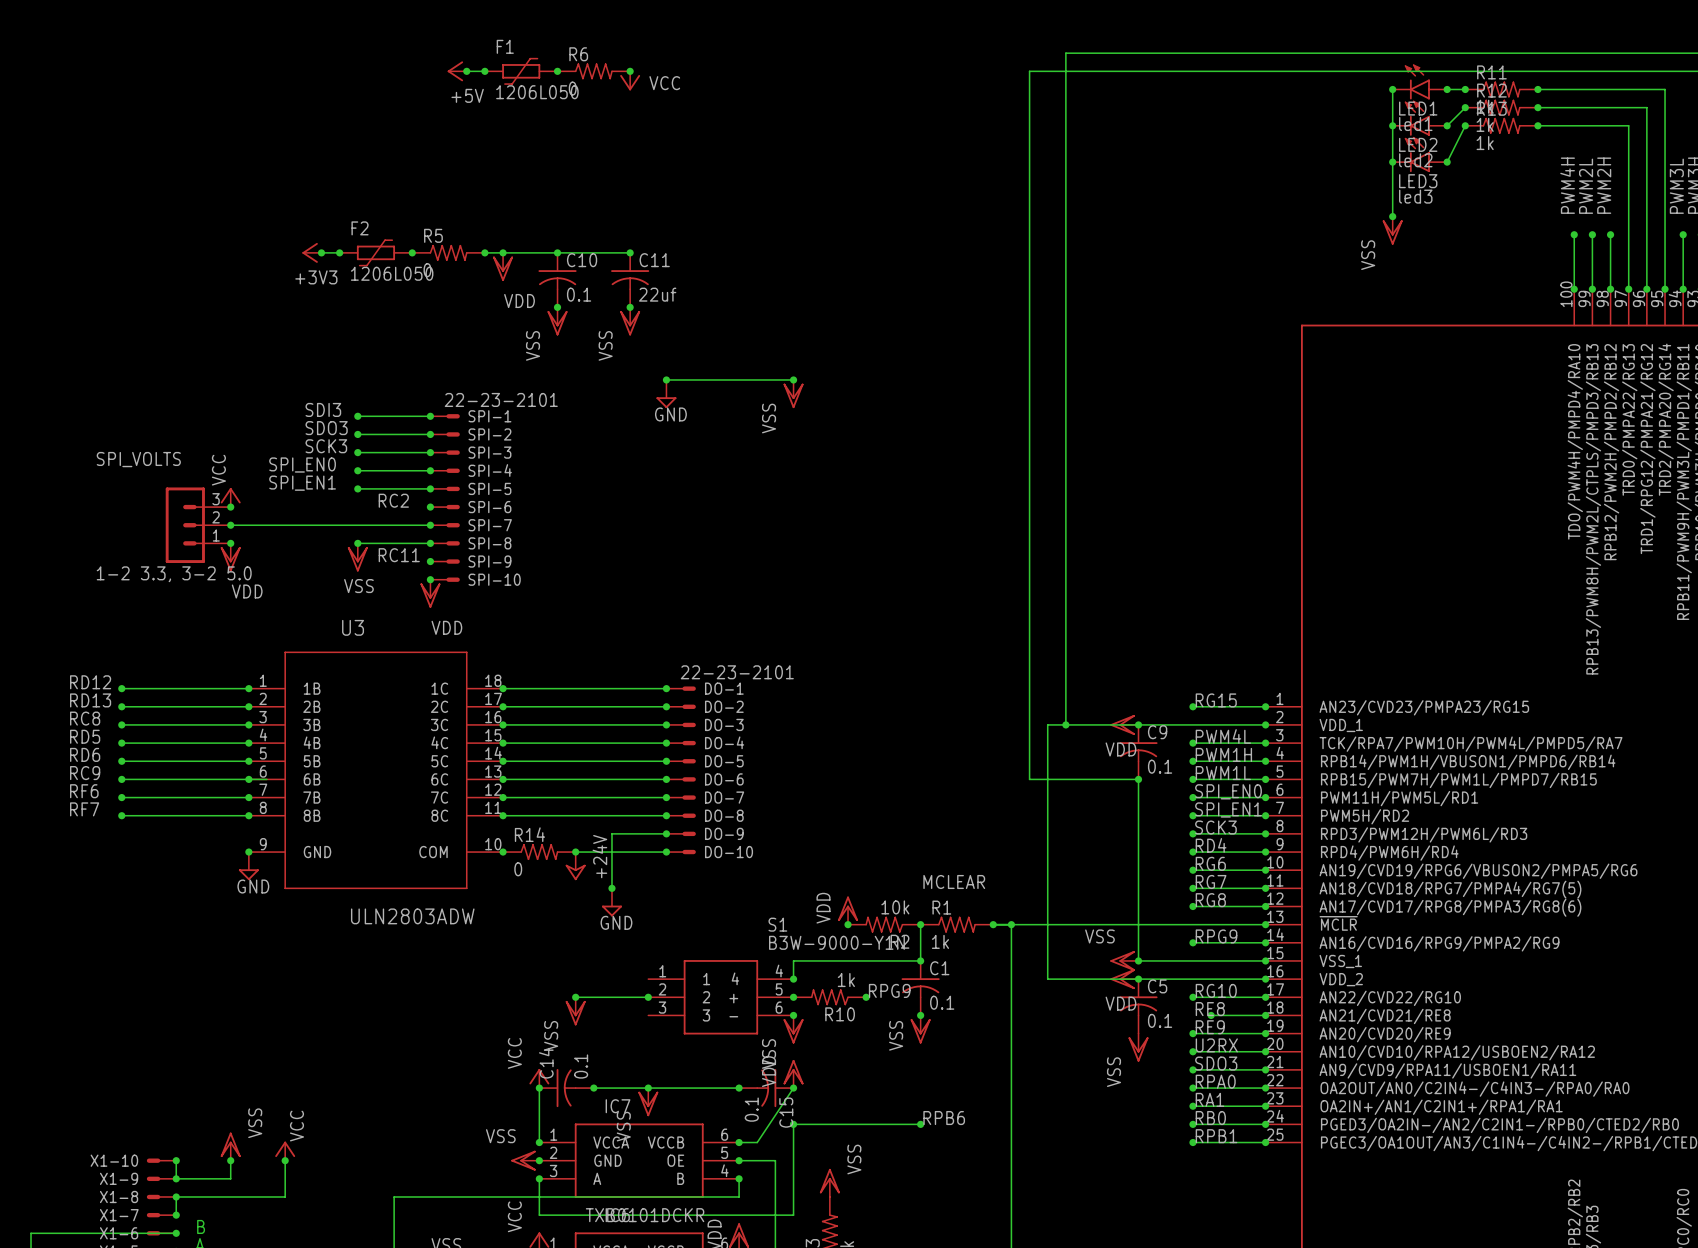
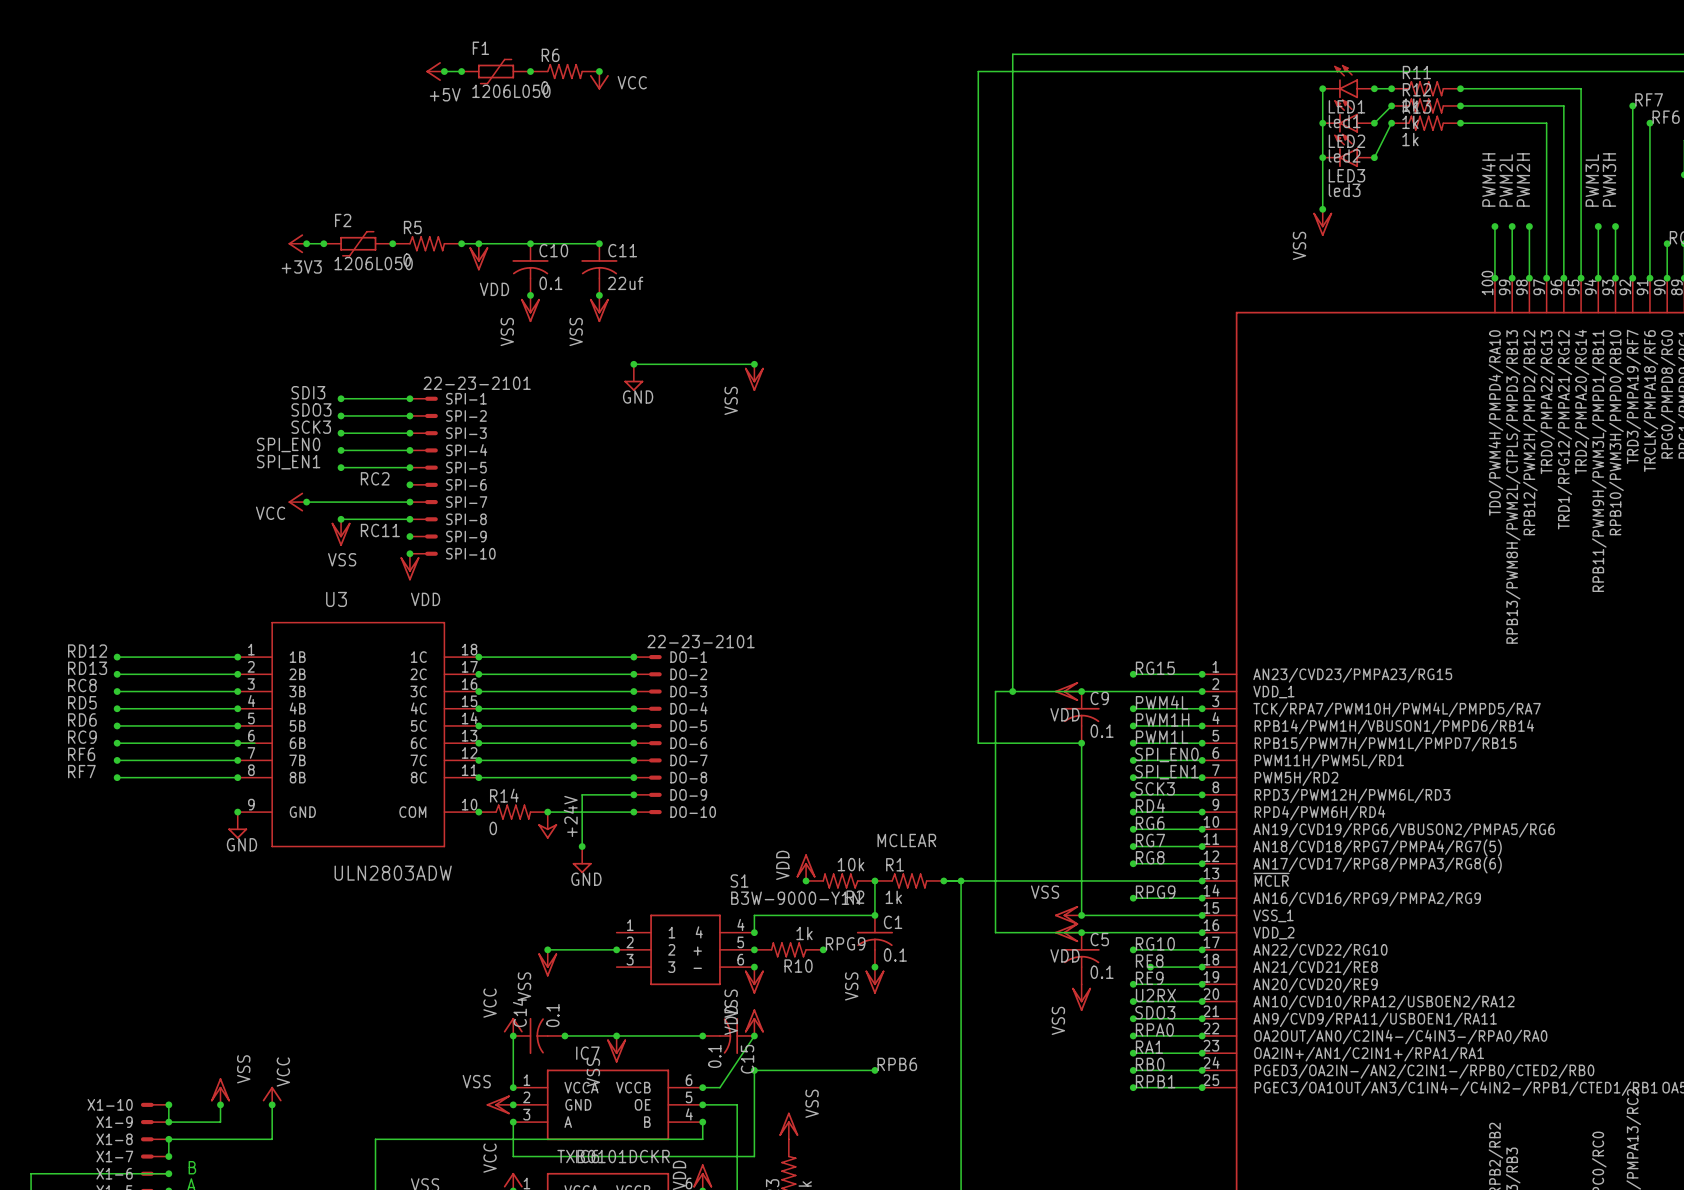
power symbol rotation: 0° (230, 495) -> 90° counterclockwise (295, 502)
power symbol position: VCC (230, 497) -> VCC (297, 502)
junction: (230, 507) -> none
SPI_VOLTS: 1-2 3.3, 3-2 5.0 (198, 525) -> none
wire: (230, 525) (321, 525) -> none
junction: (230, 525) -> none
junction: none -> (306, 502)
junction: (230, 543) -> none
power symbol: VDD (230, 557) -> none

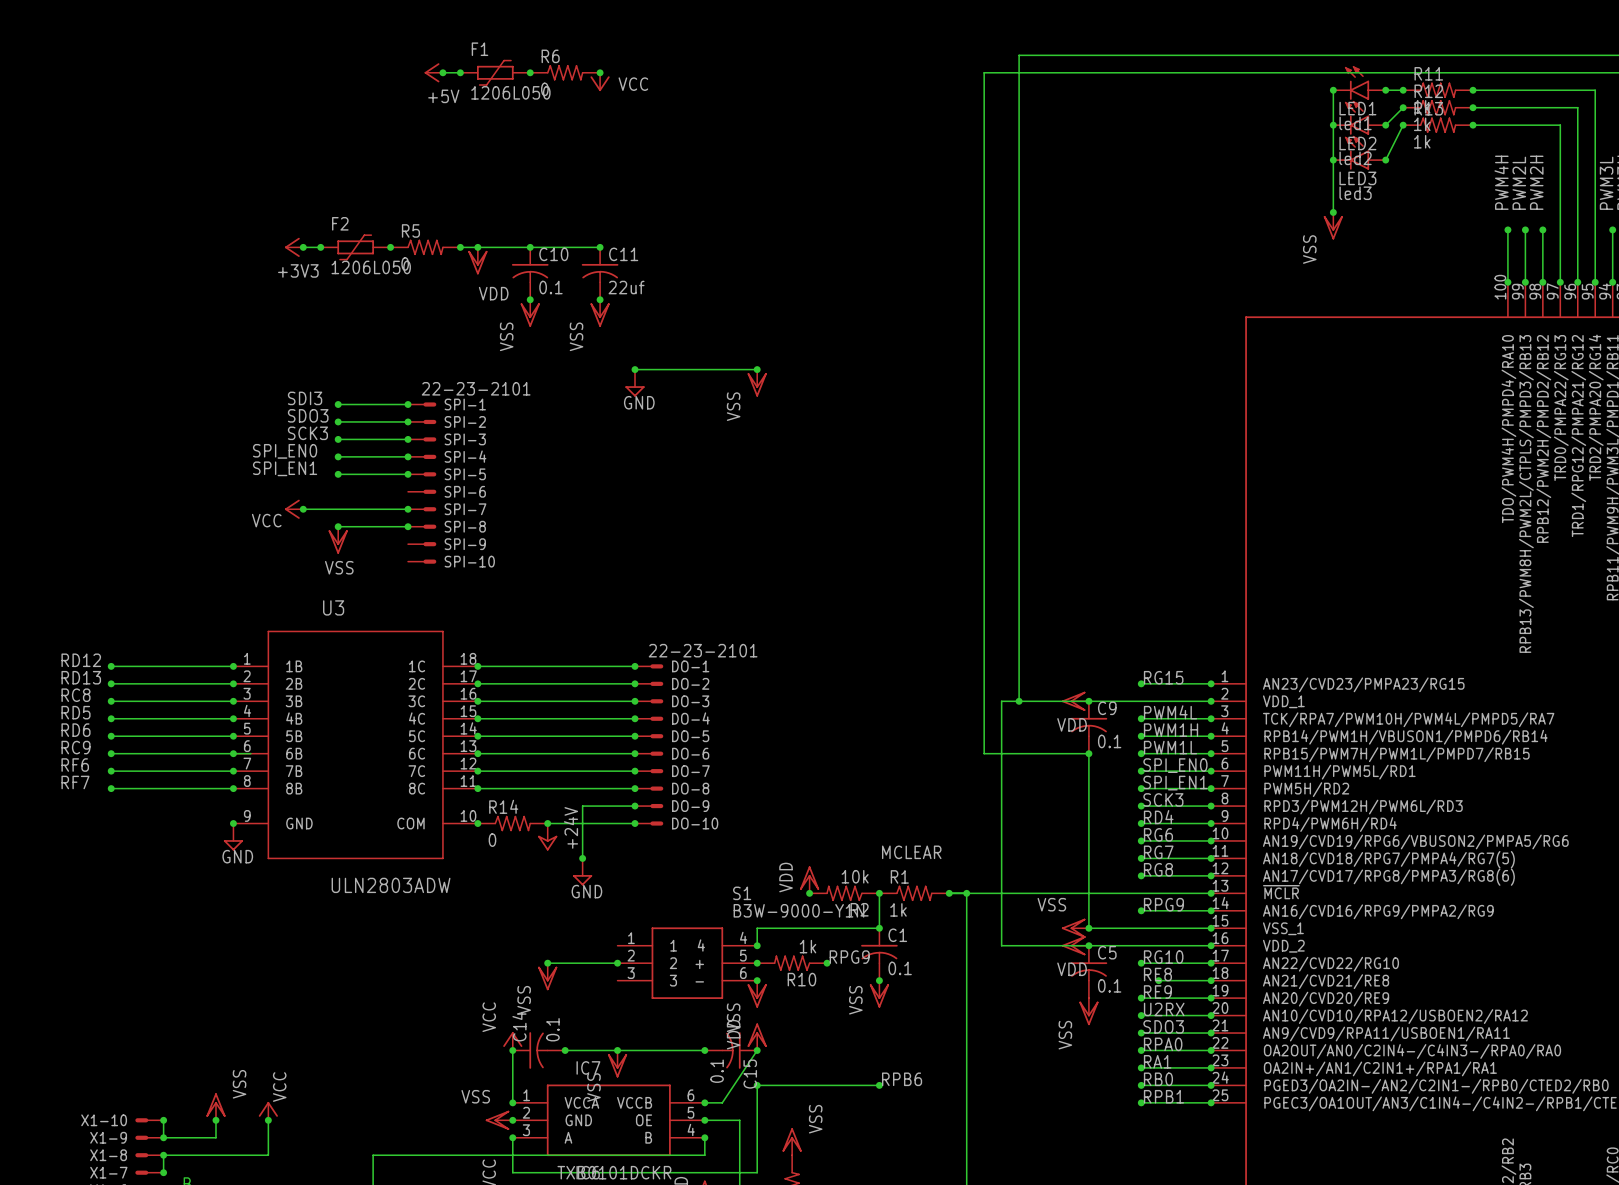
label: RC2 (375, 478) -> none
junction: (409, 484) -> none
label: RC11 (380, 530) -> none
junction: (409, 536) -> none
junction: (409, 553) -> none
power symbol: VDD (409, 567) -> none

